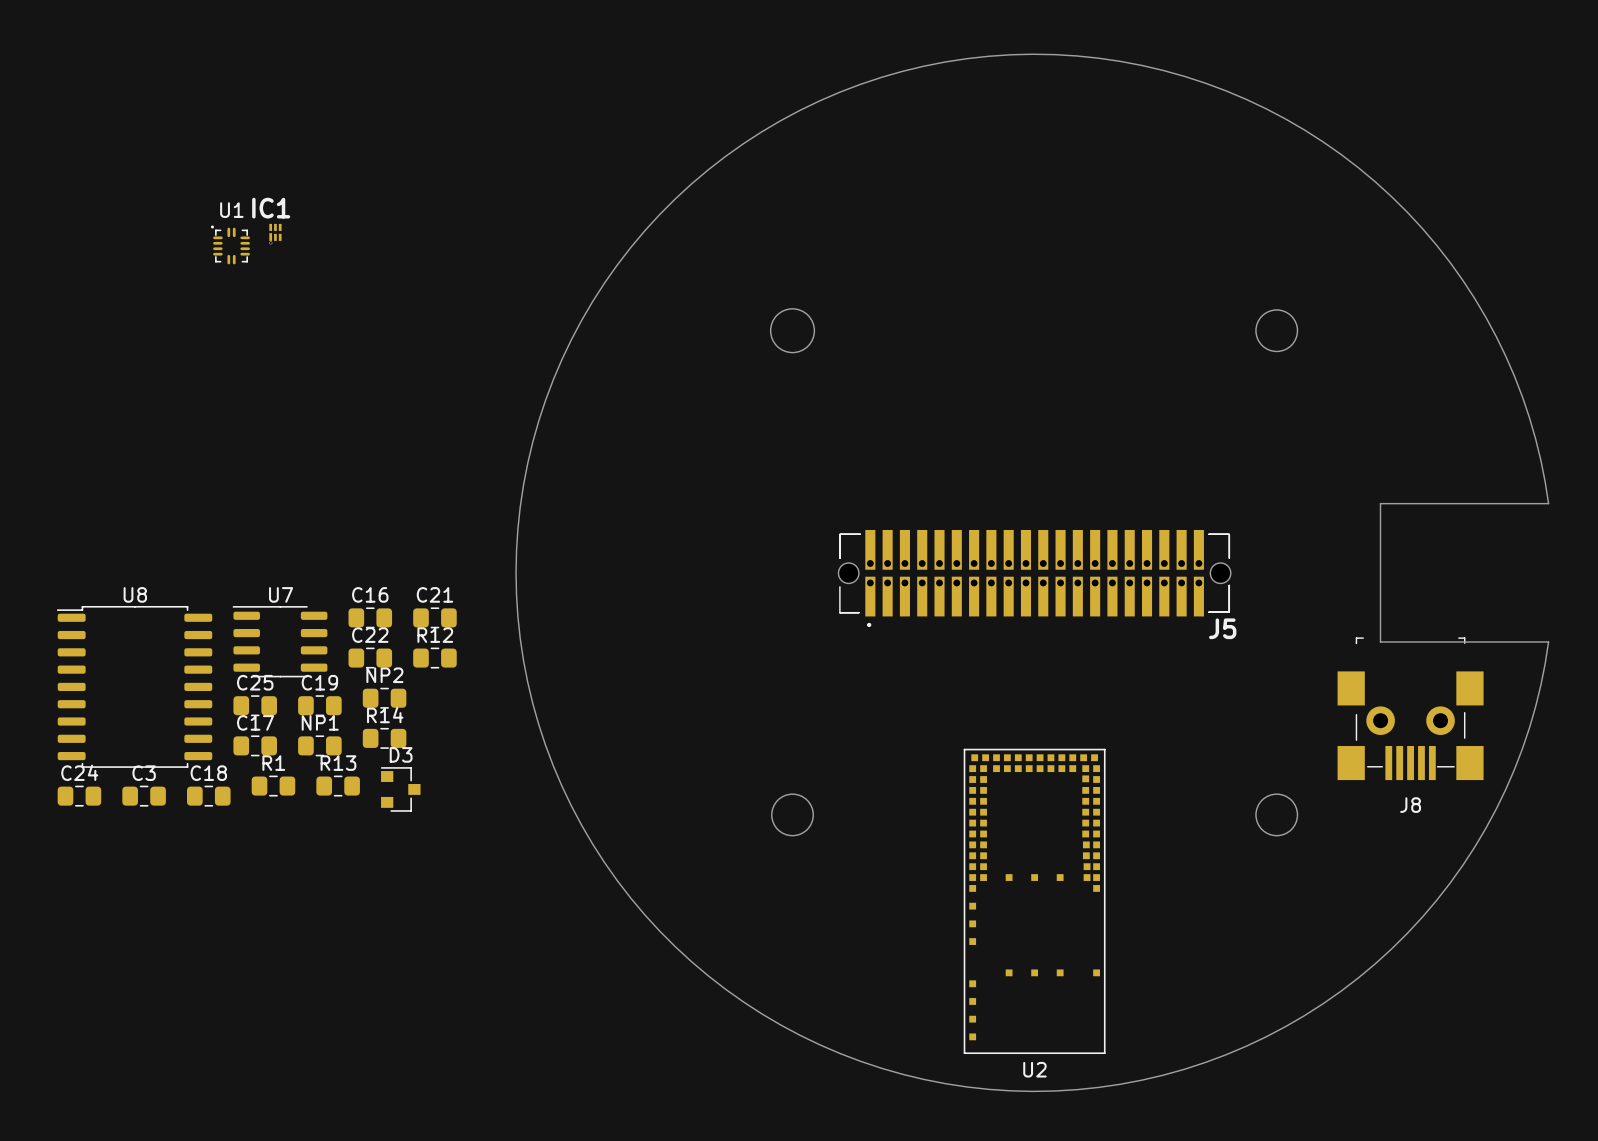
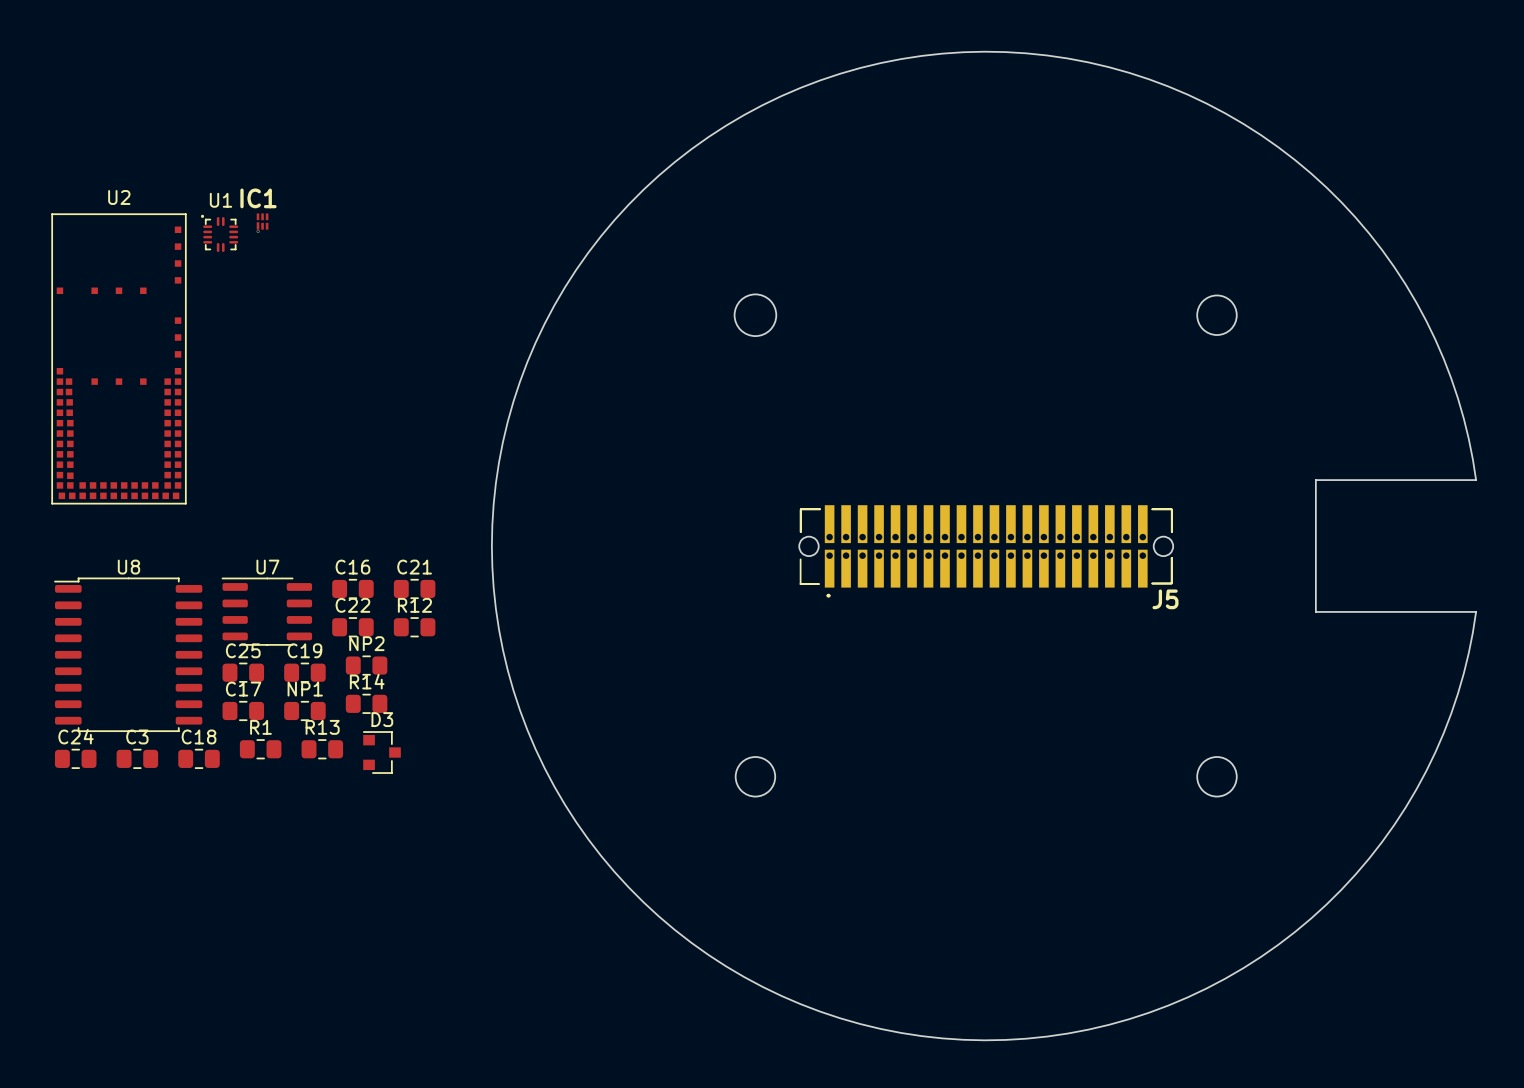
J8: (1410, 708) -> none
U2 rotation: 0° (1034, 901) -> 180° (119, 358)
U2 position: (1034, 901) -> (119, 358)

